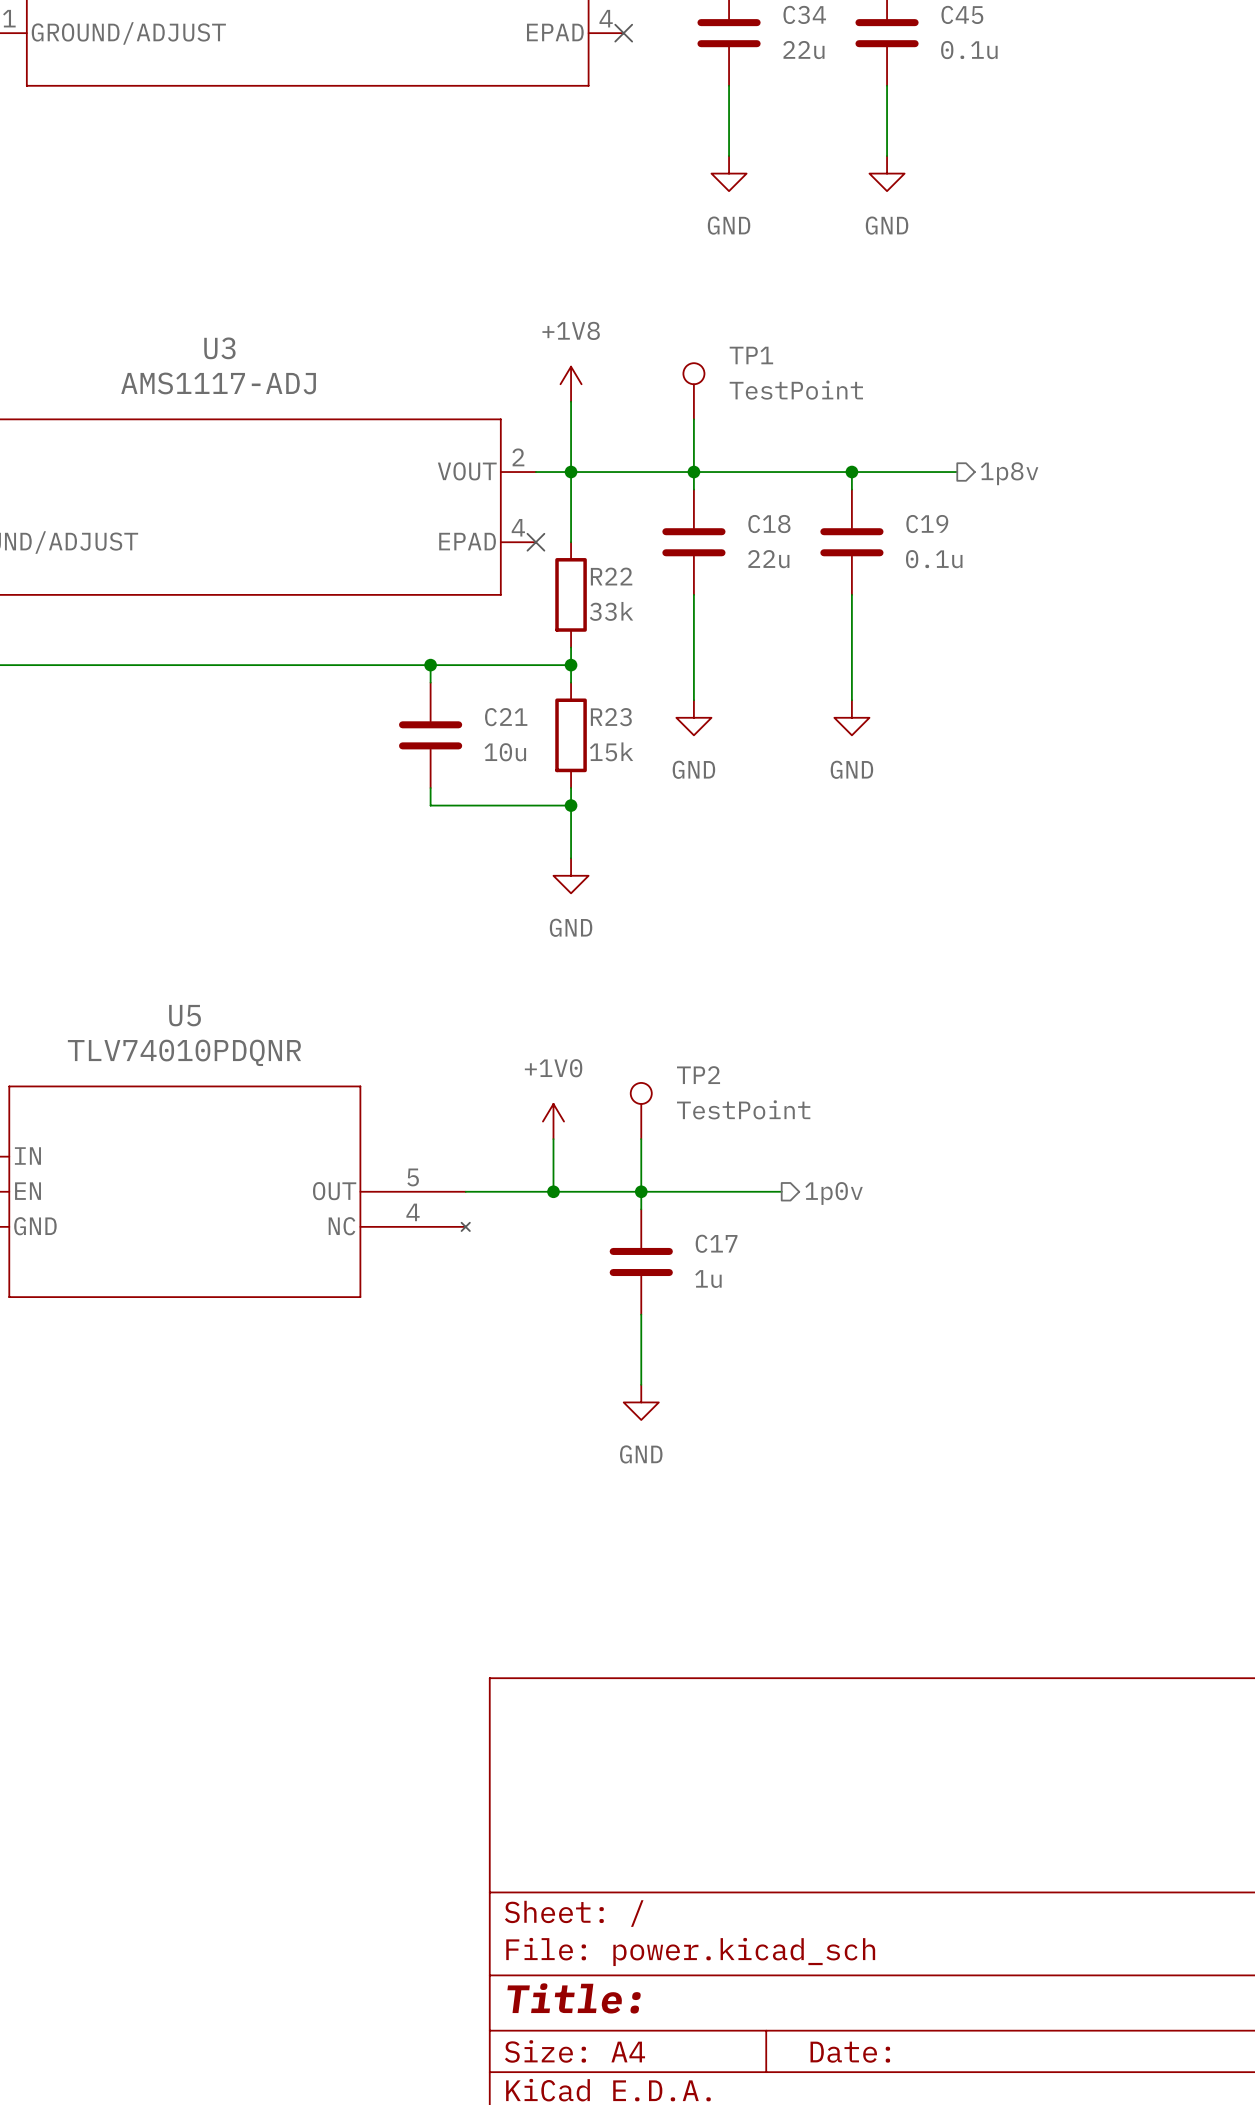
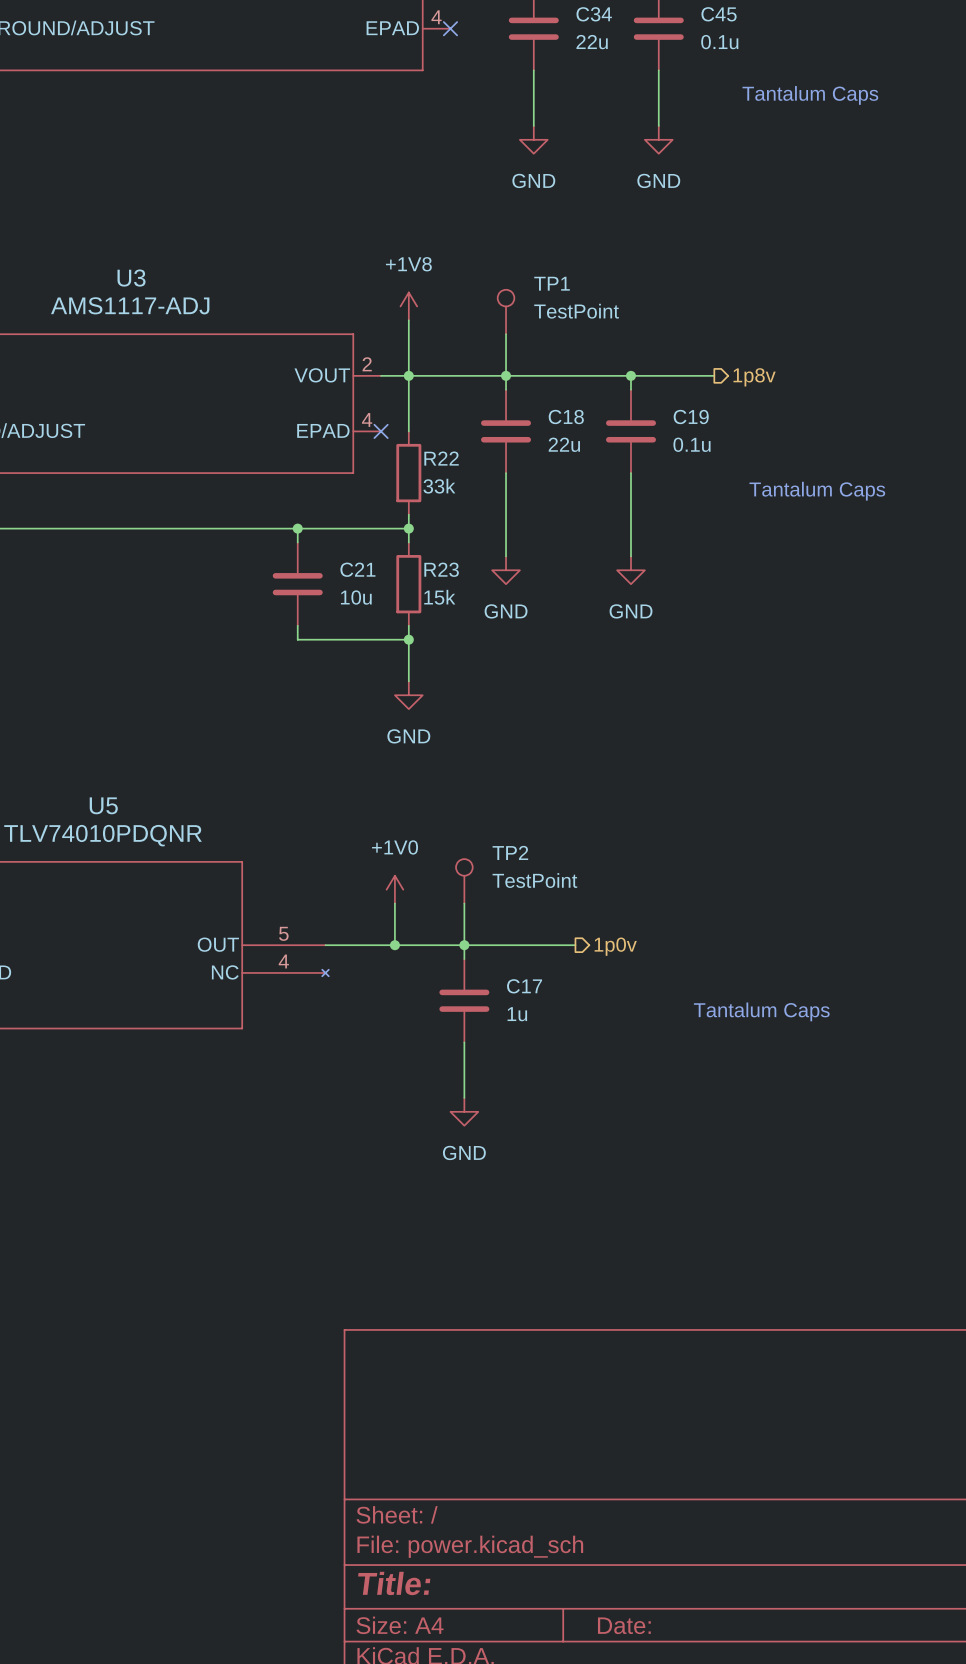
text: none -> Tantalum Caps (810, 95)
text: none -> Tantalum Caps (817, 491)
text: none -> Tantalum Caps (761, 1011)

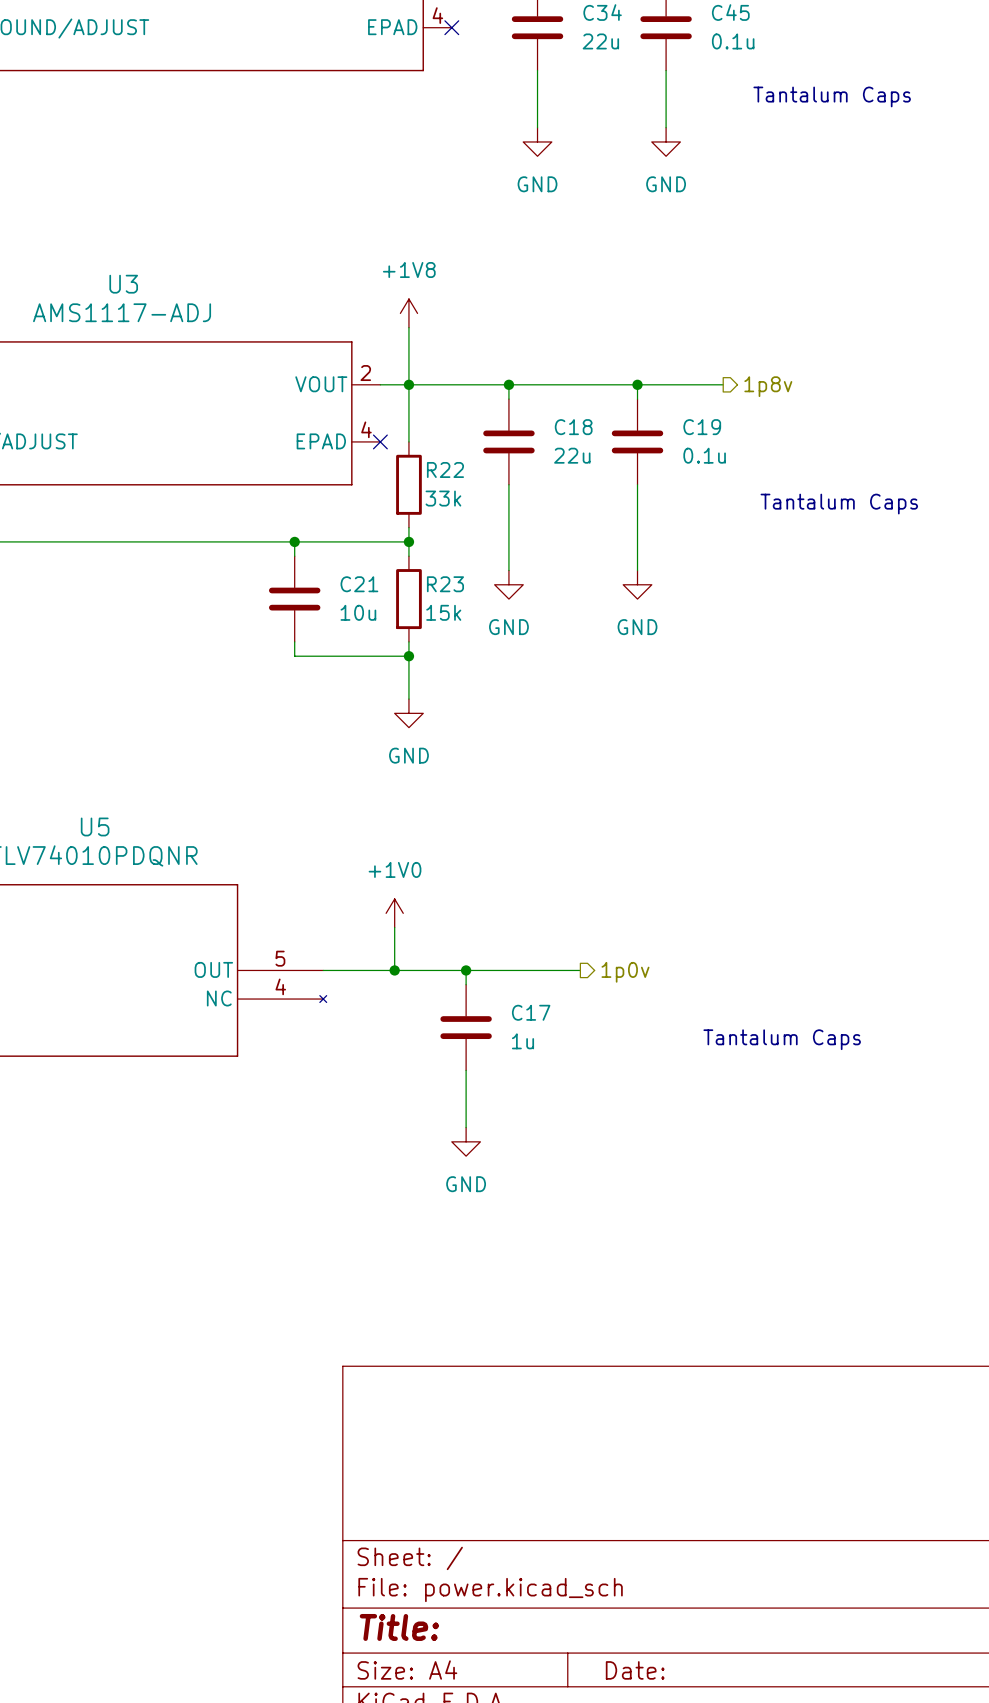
TP1: TestPoint (506, 312) -> none
wire: (506, 334) (506, 375) -> none
TP2: TestPoint (464, 881) -> none
wire: (464, 903) (464, 945) -> none

